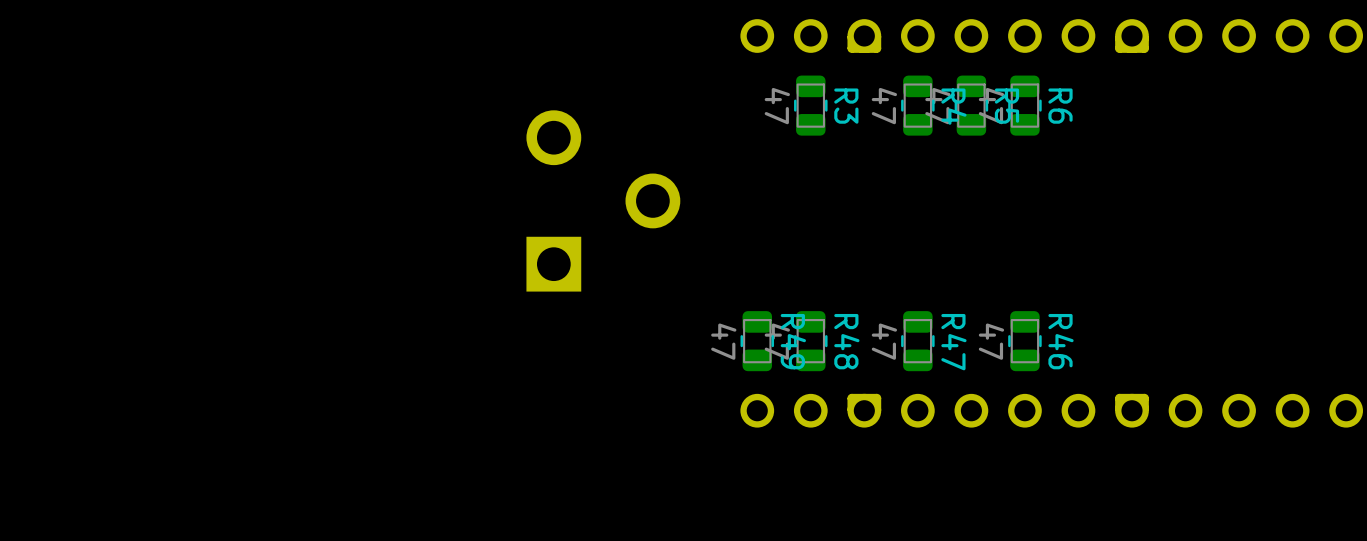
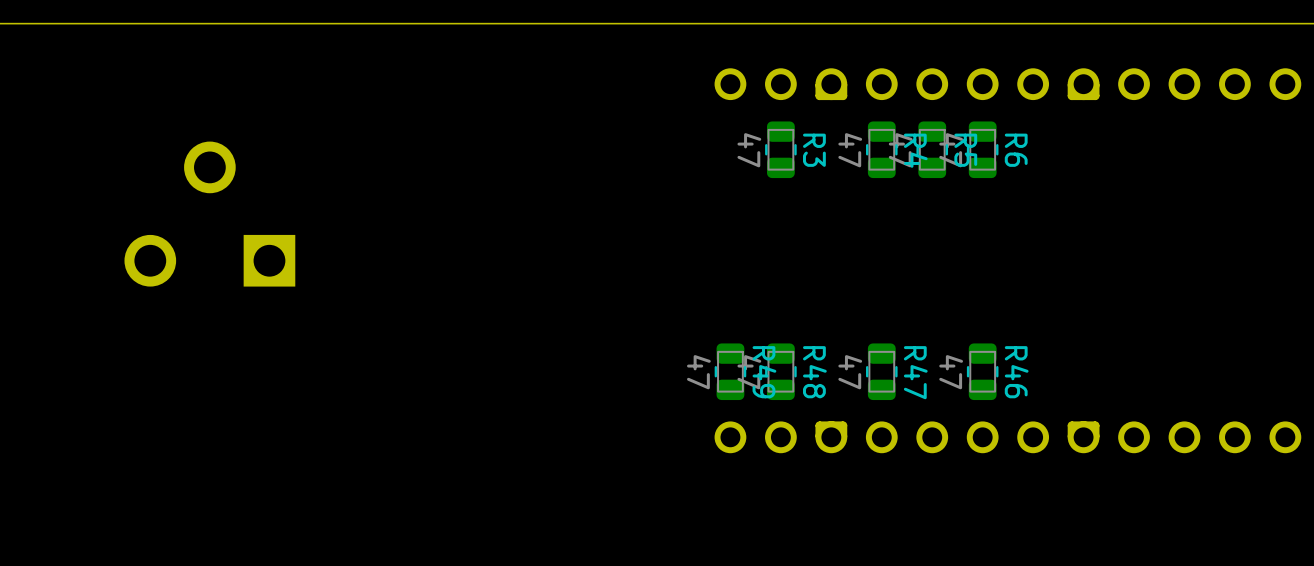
part rotation: 0° (603, 200) -> 90° counterclockwise (209, 214)
part position: (603, 200) -> (209, 214)

